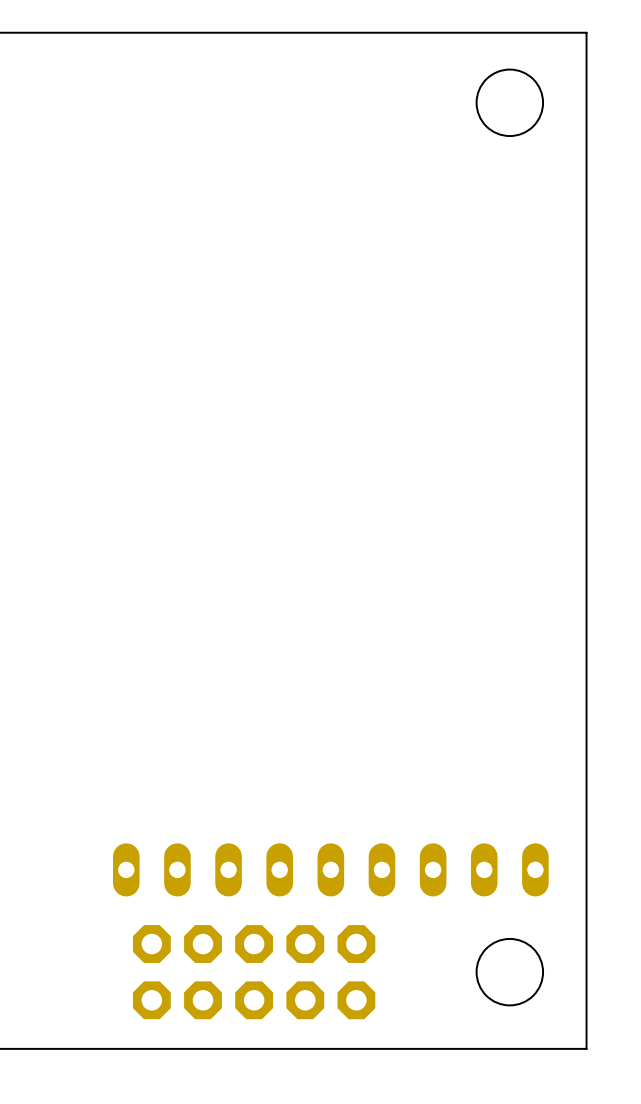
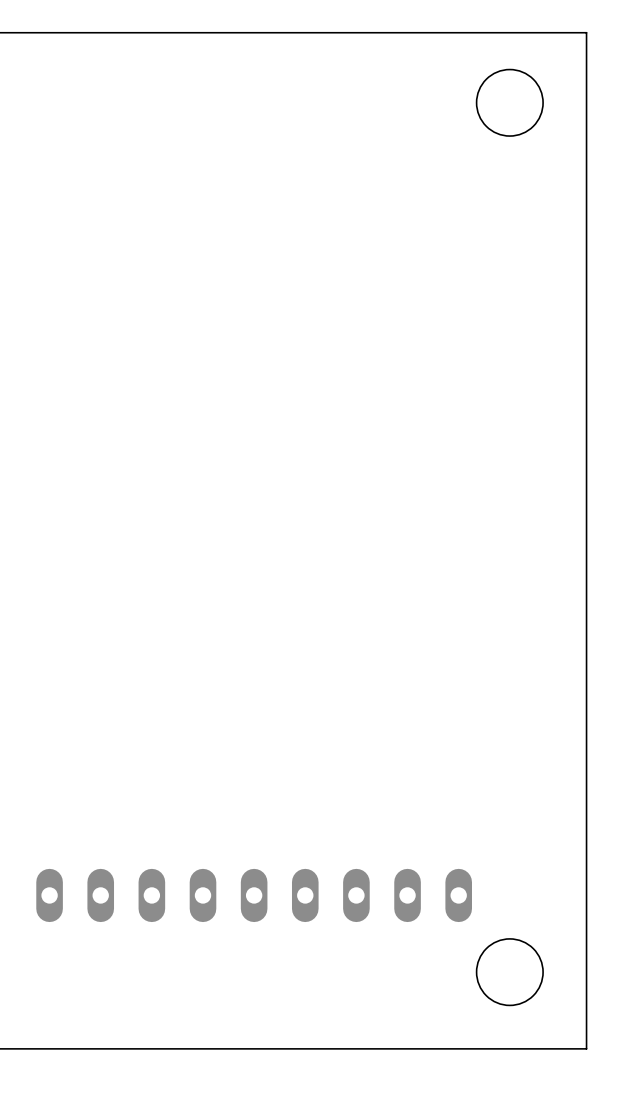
part position: (330, 869) -> (254, 895)
part: (254, 972) -> none

